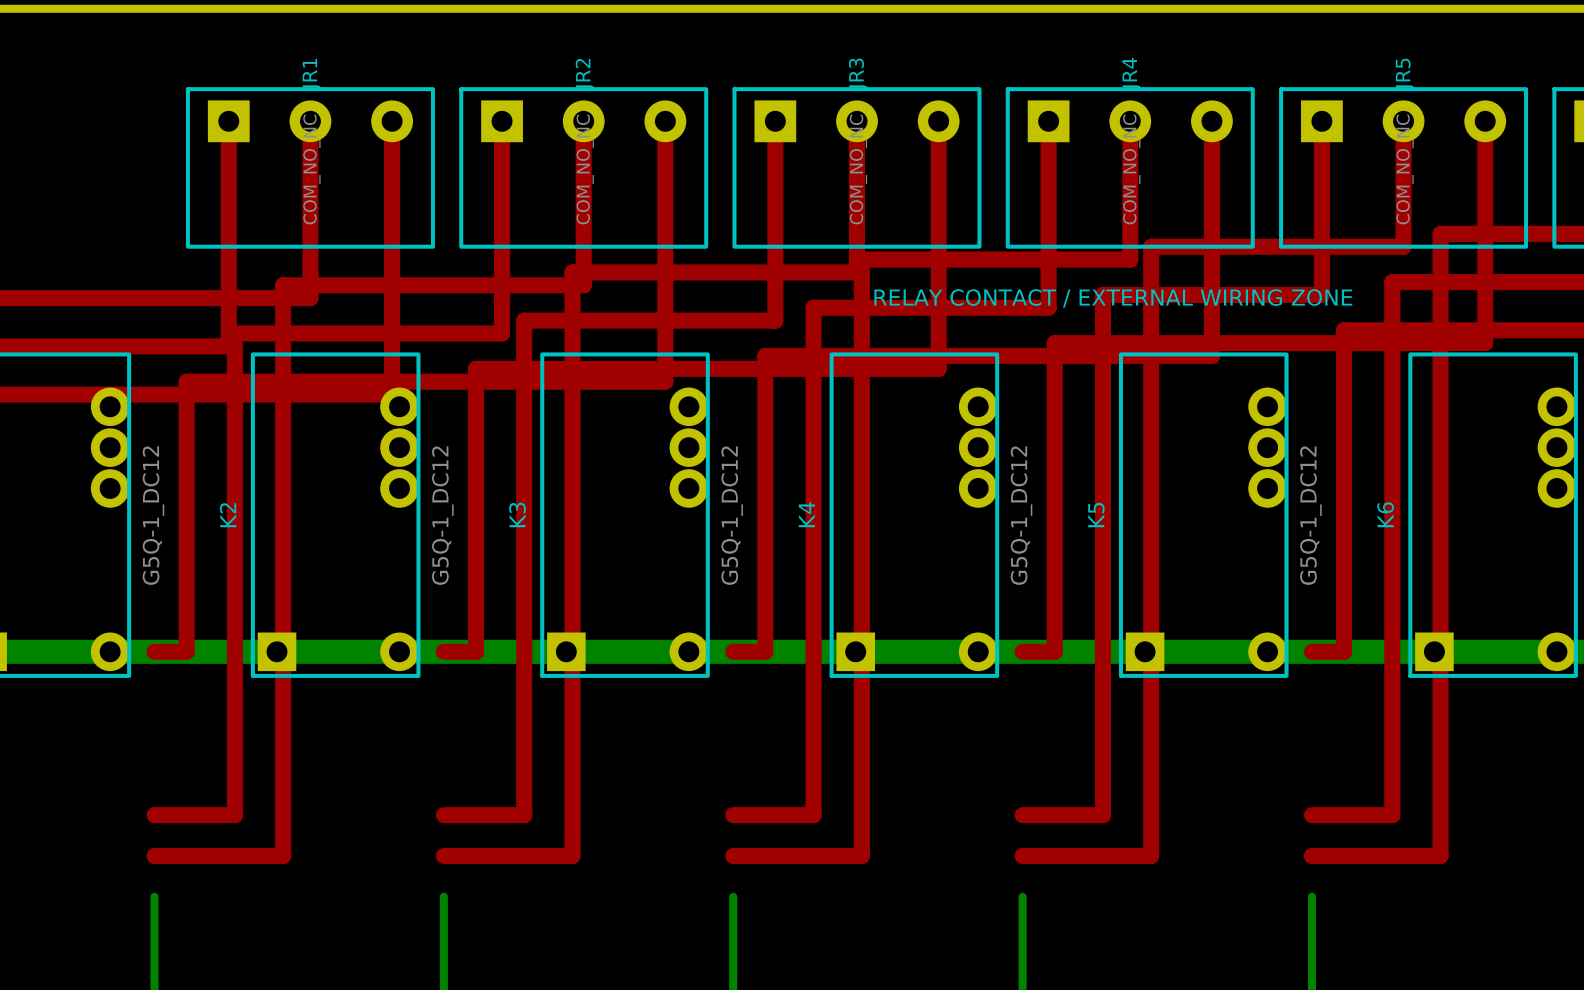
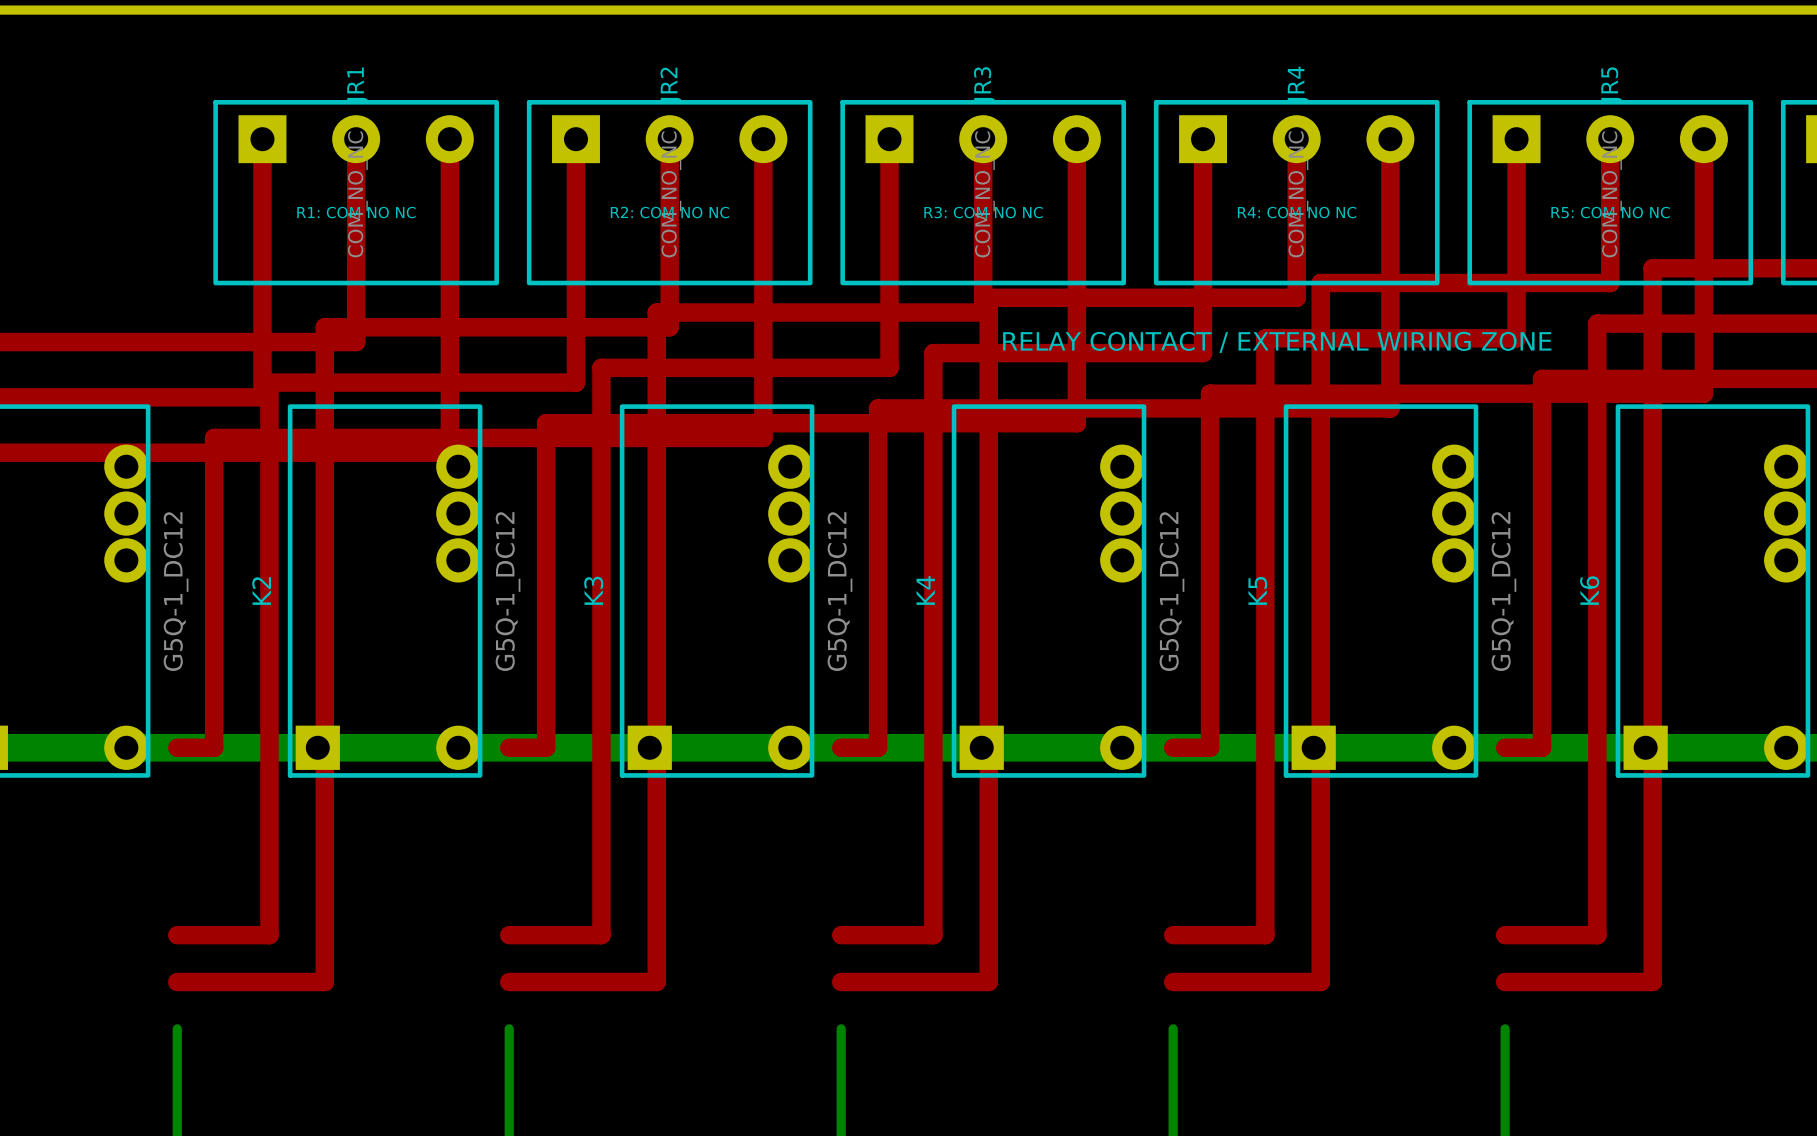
text: none -> R1: COM NO NC (356, 212)
text: none -> R2: COM NO NC (670, 212)
text: none -> R3: COM NO NC (983, 212)
text: none -> R4: COM NO NC (1297, 212)
text: none -> R5: COM NO NC (1610, 212)

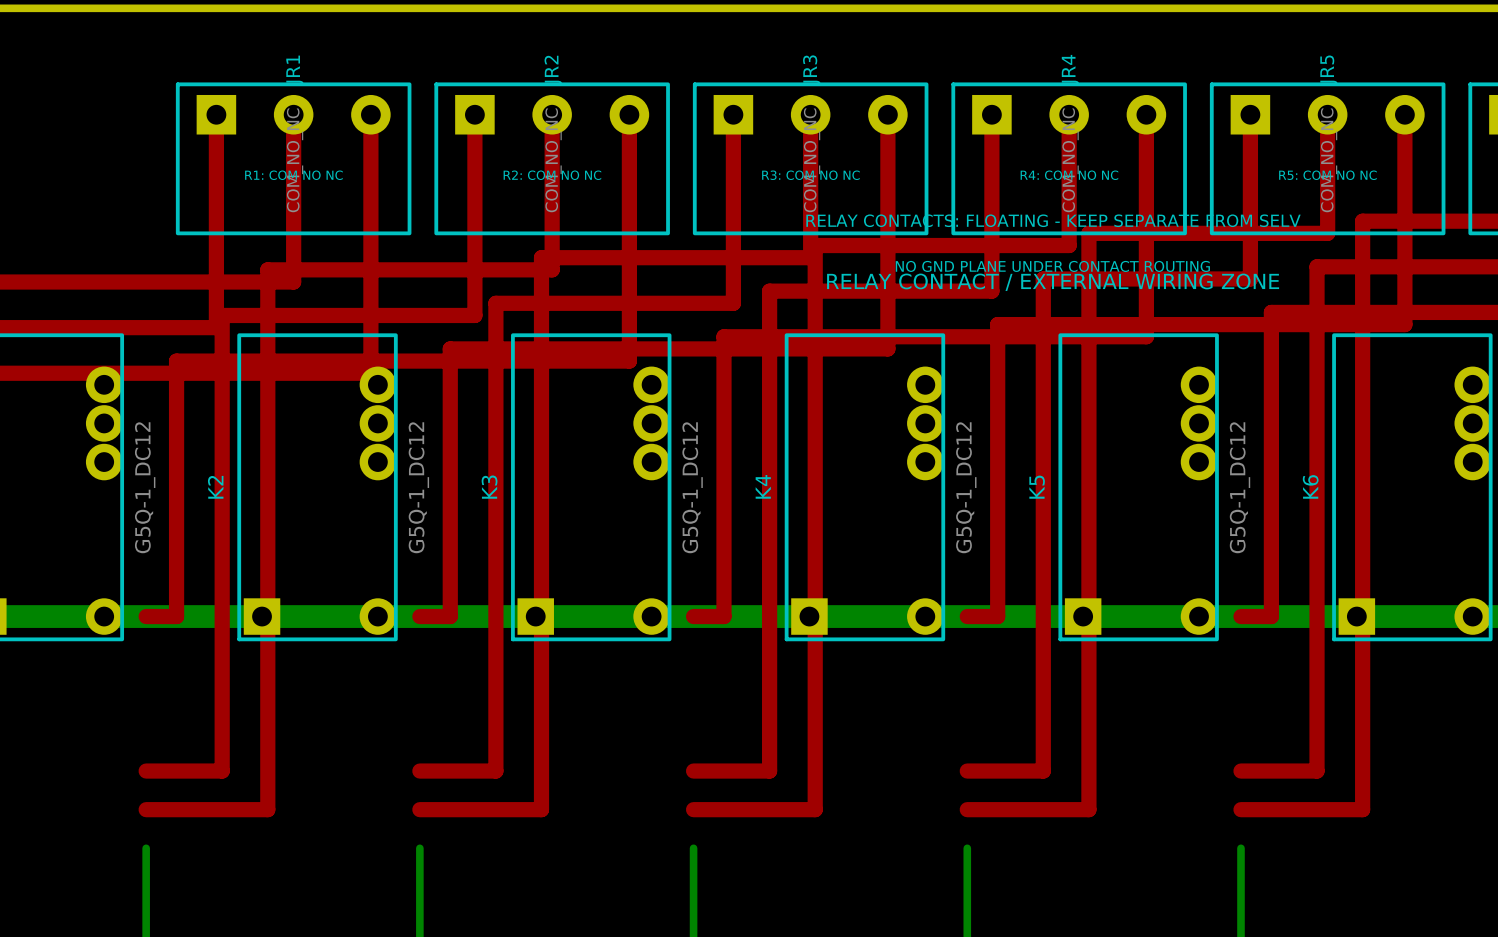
text: none -> RELAY CONTACTS: FLOATING - KEEP SEPARATE FROM SELV (1053, 220)
text: none -> NO GND PLANE UNDER CONTACT ROUTING (1052, 266)

